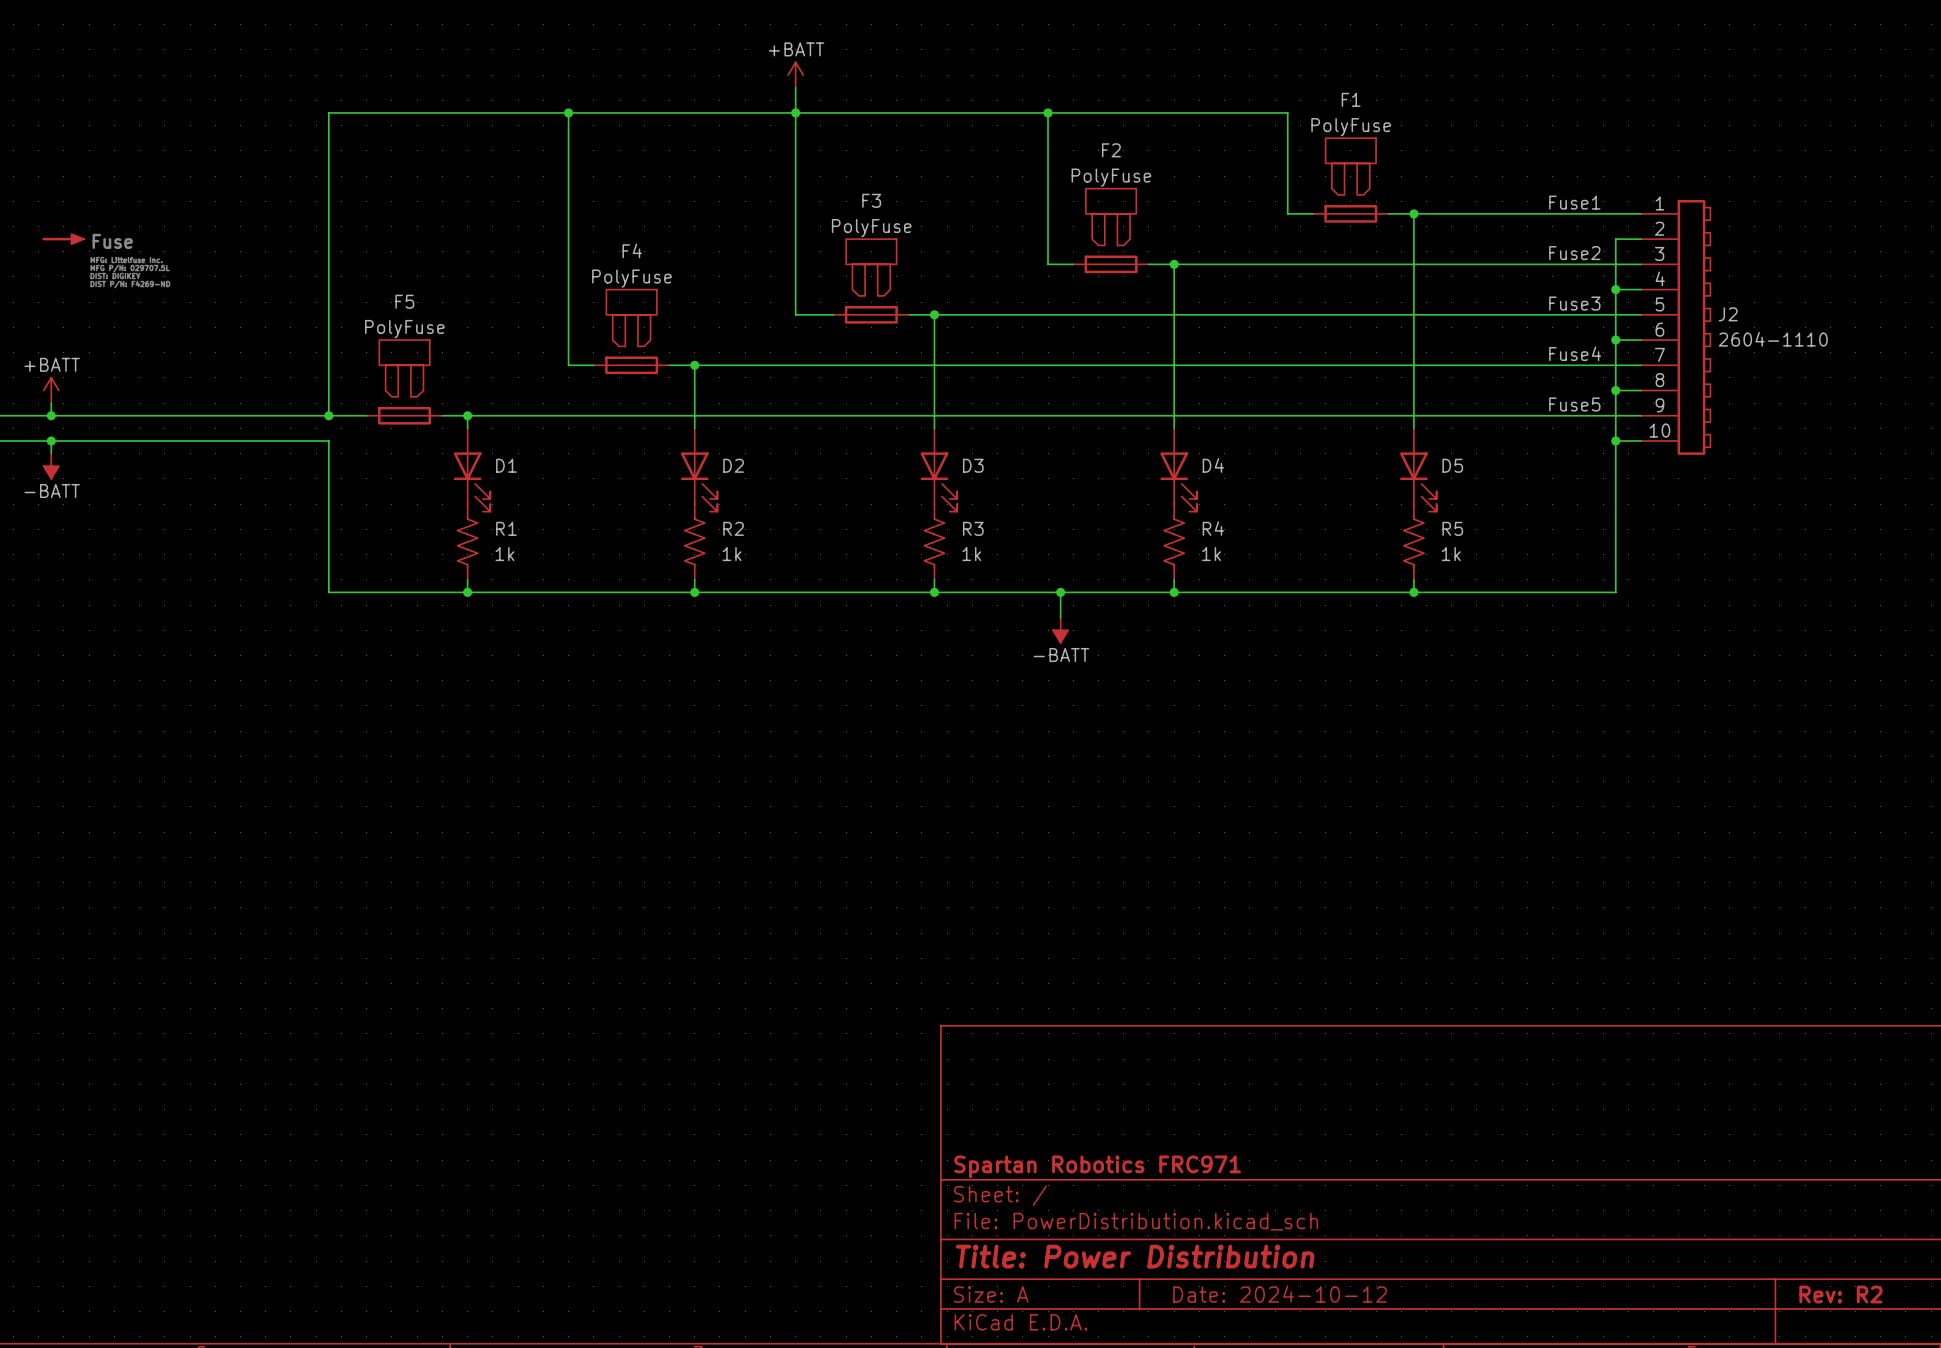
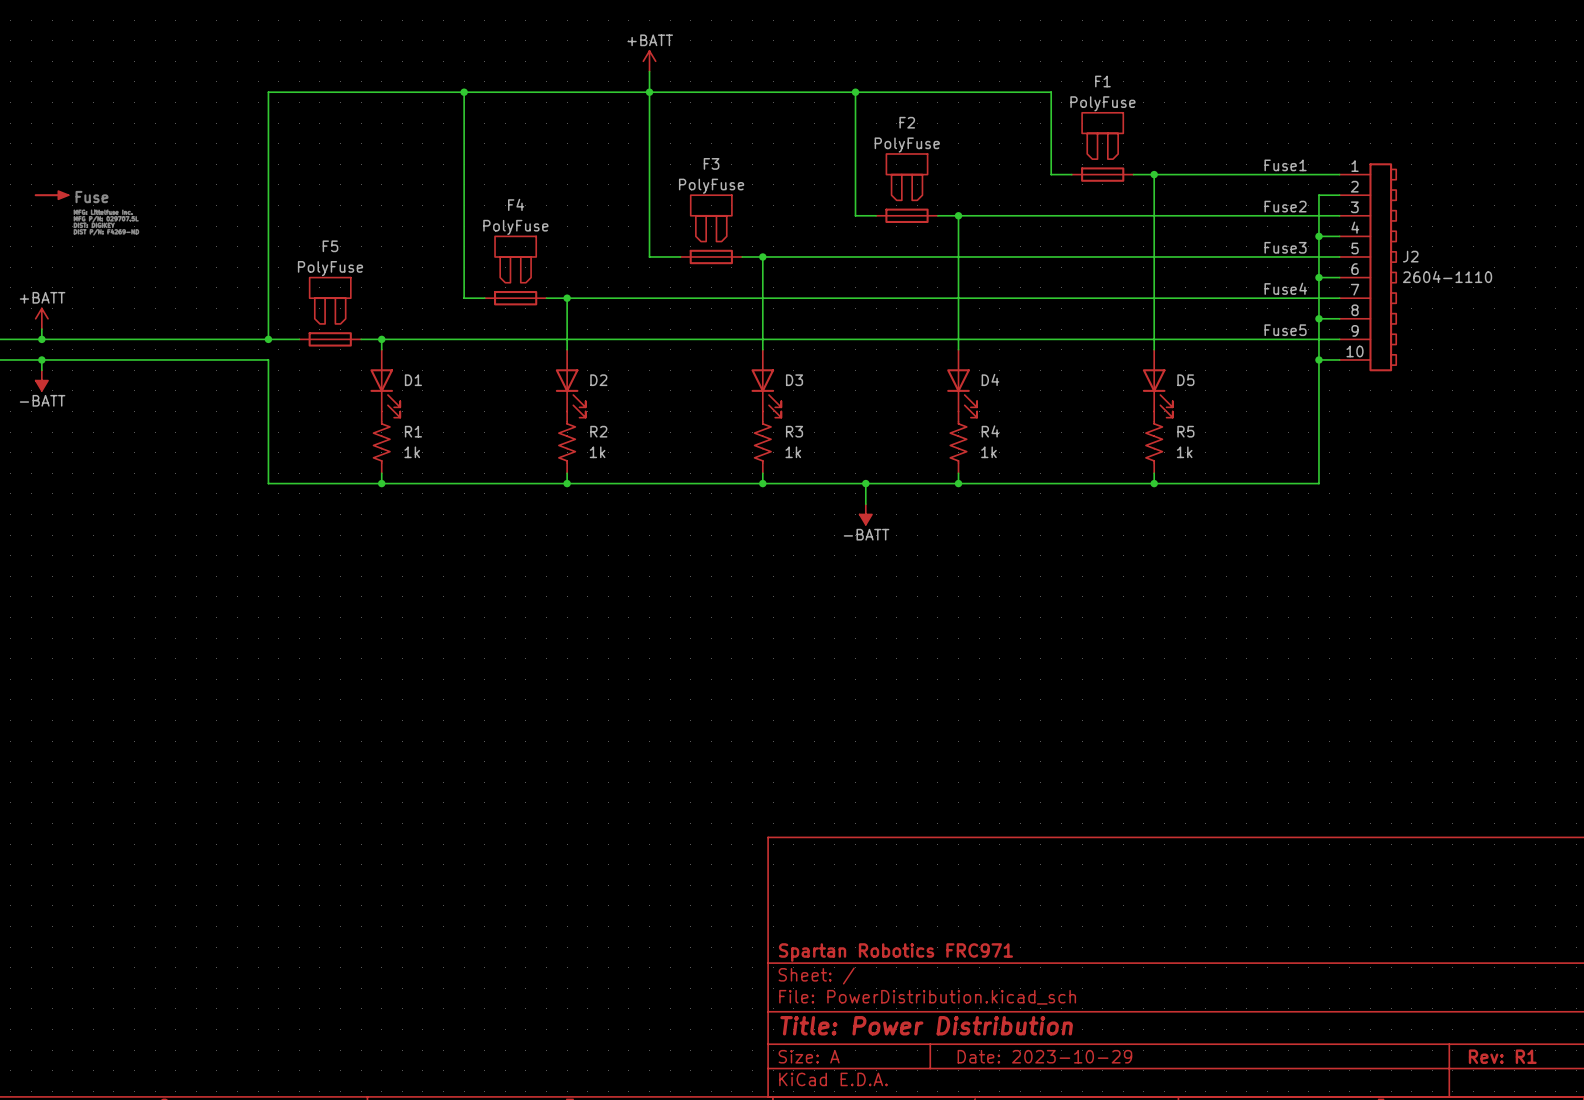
title block: Date: 2024-10-12 (1280, 1294) -> Date: 2023-10-29 (1044, 1056)
title block: Rev: R2 (1840, 1294) -> Rev: R1 (1502, 1056)

